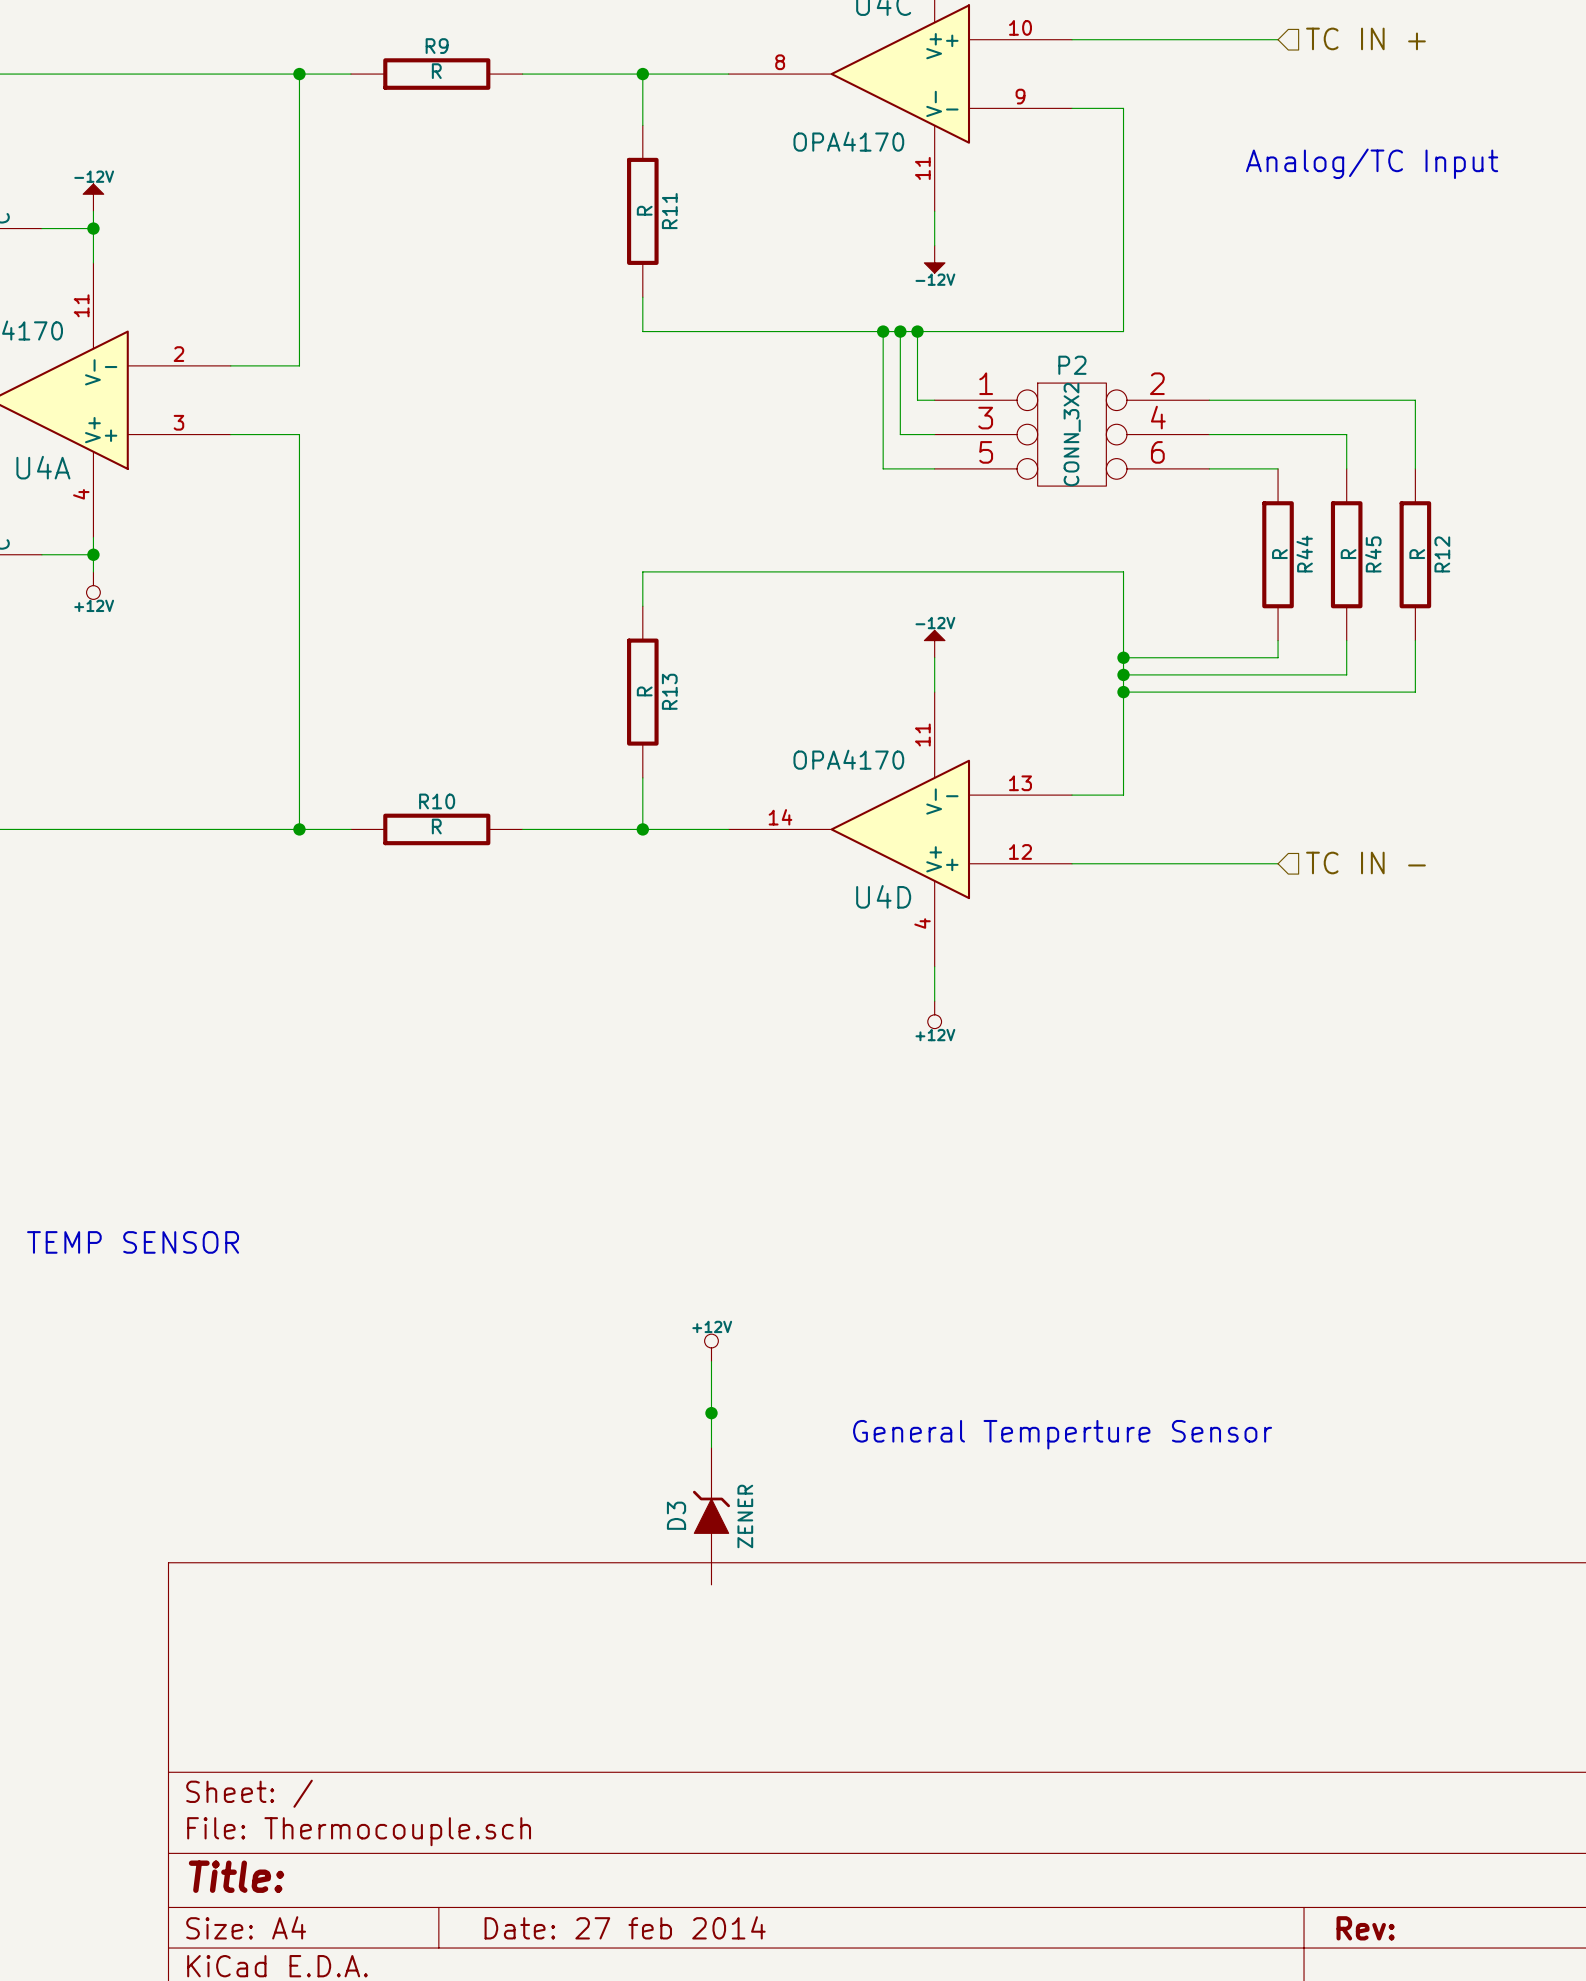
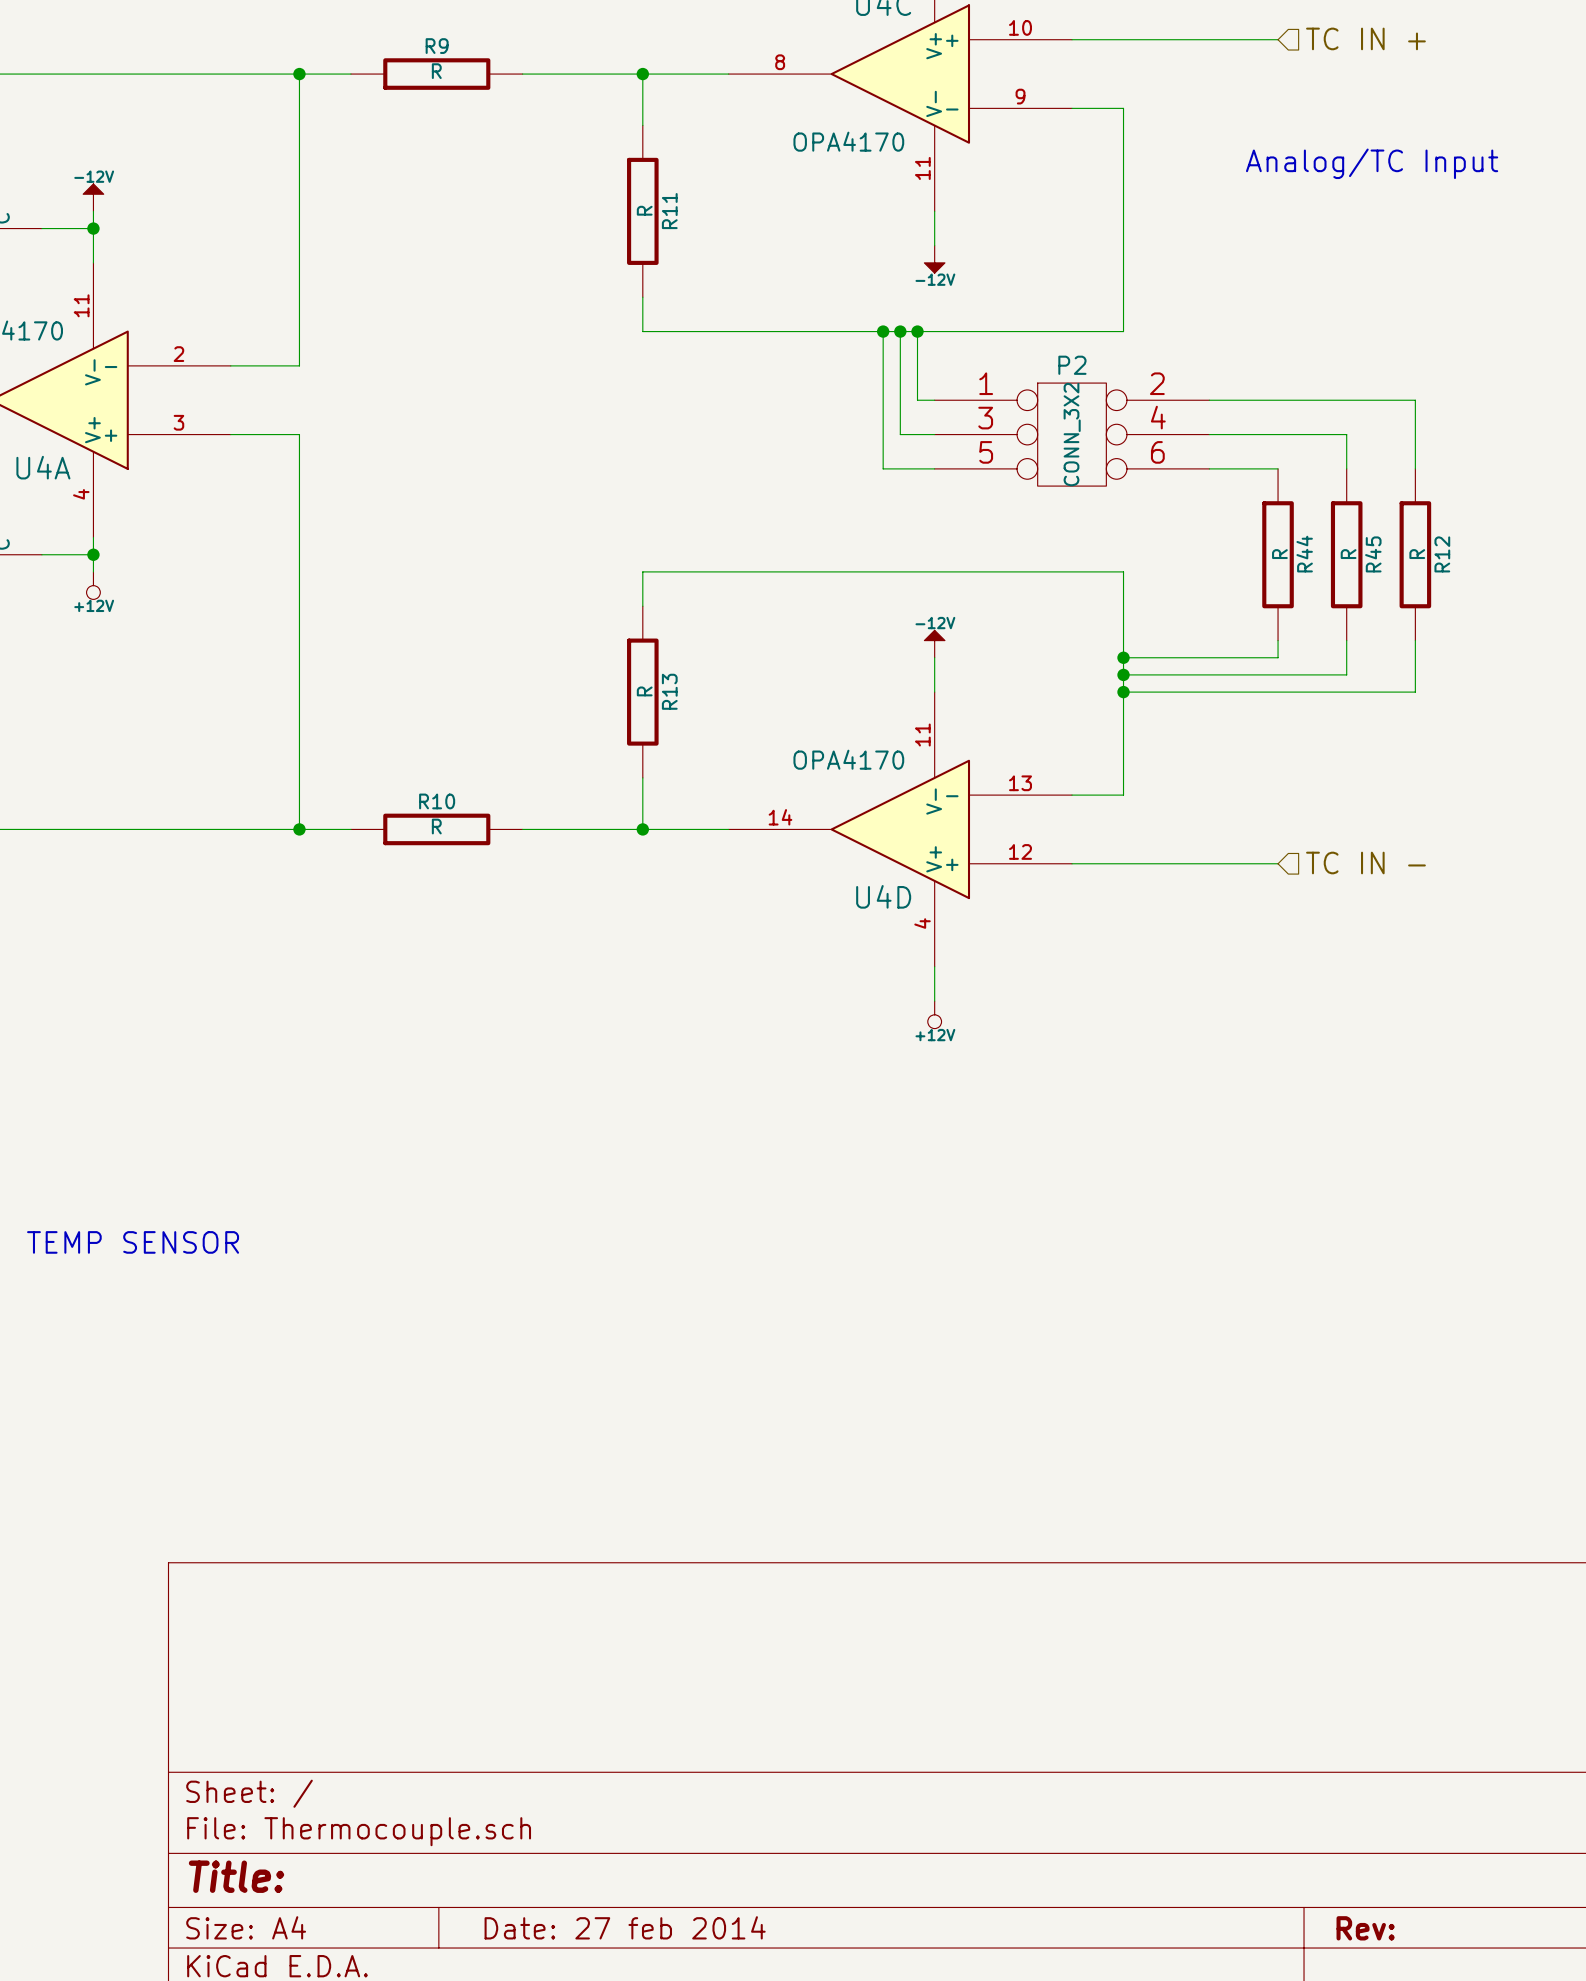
power symbol: +12V (711, 1347) -> none
wire: (711, 1361) (711, 1447) -> none
junction: (711, 1413) -> none
text: General Temperture Sensor (1062, 1434) -> none
D3: ZENER (711, 1516) -> none

